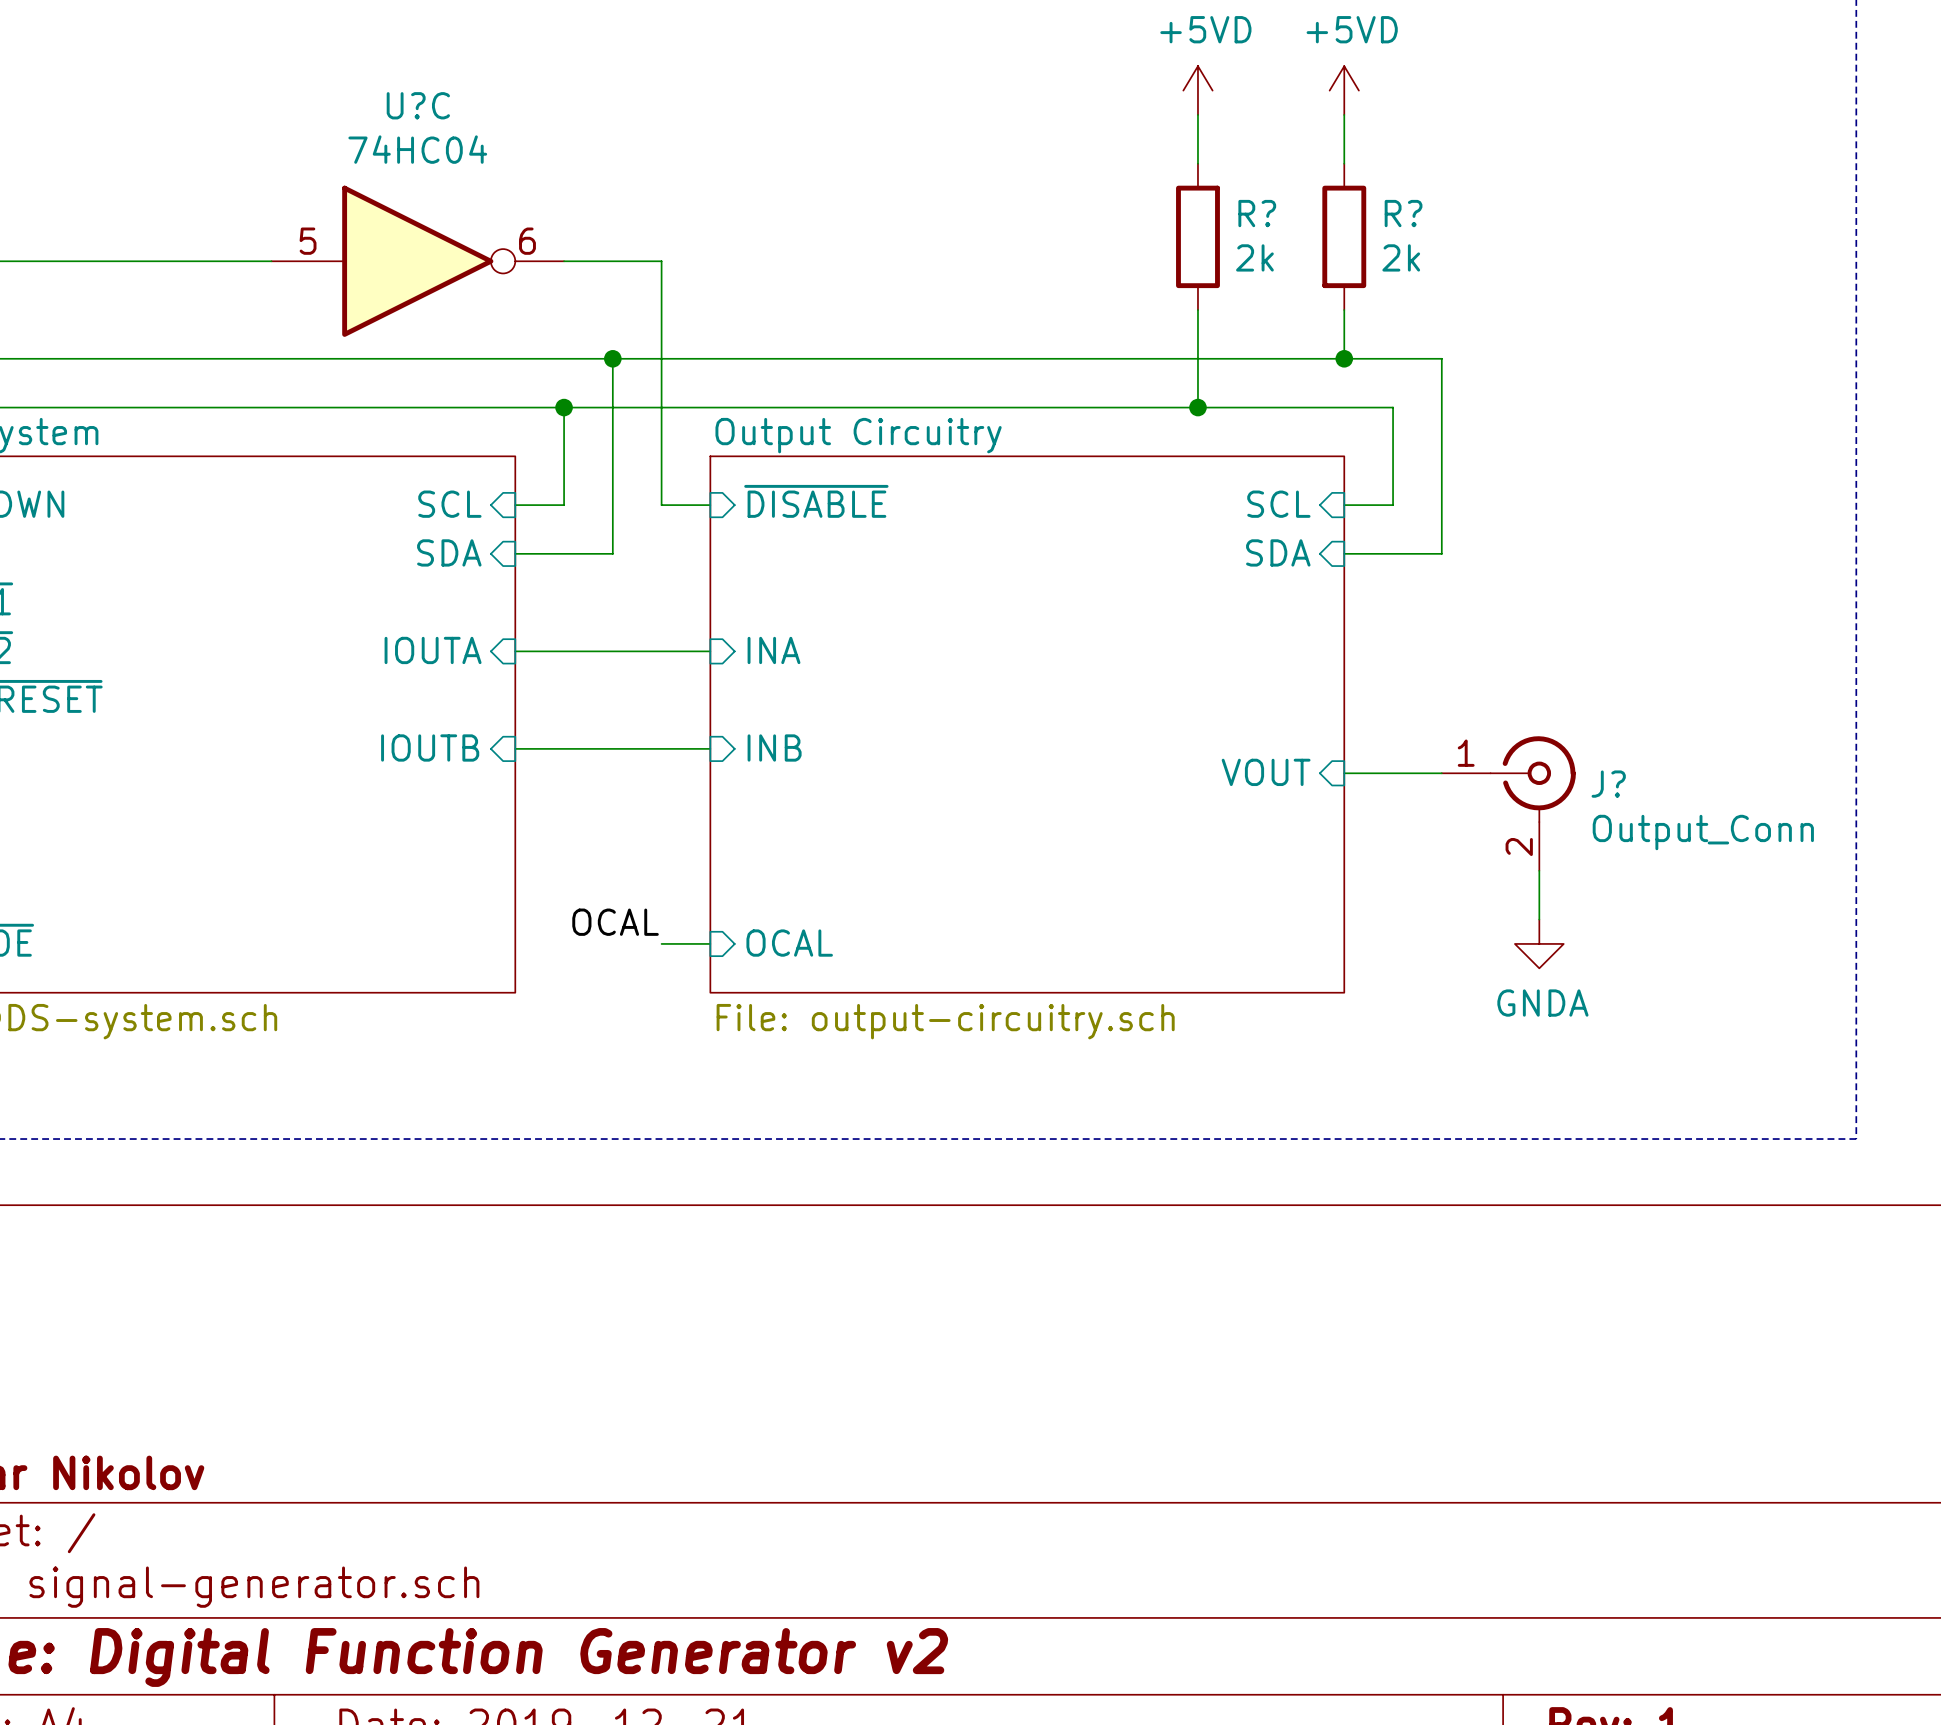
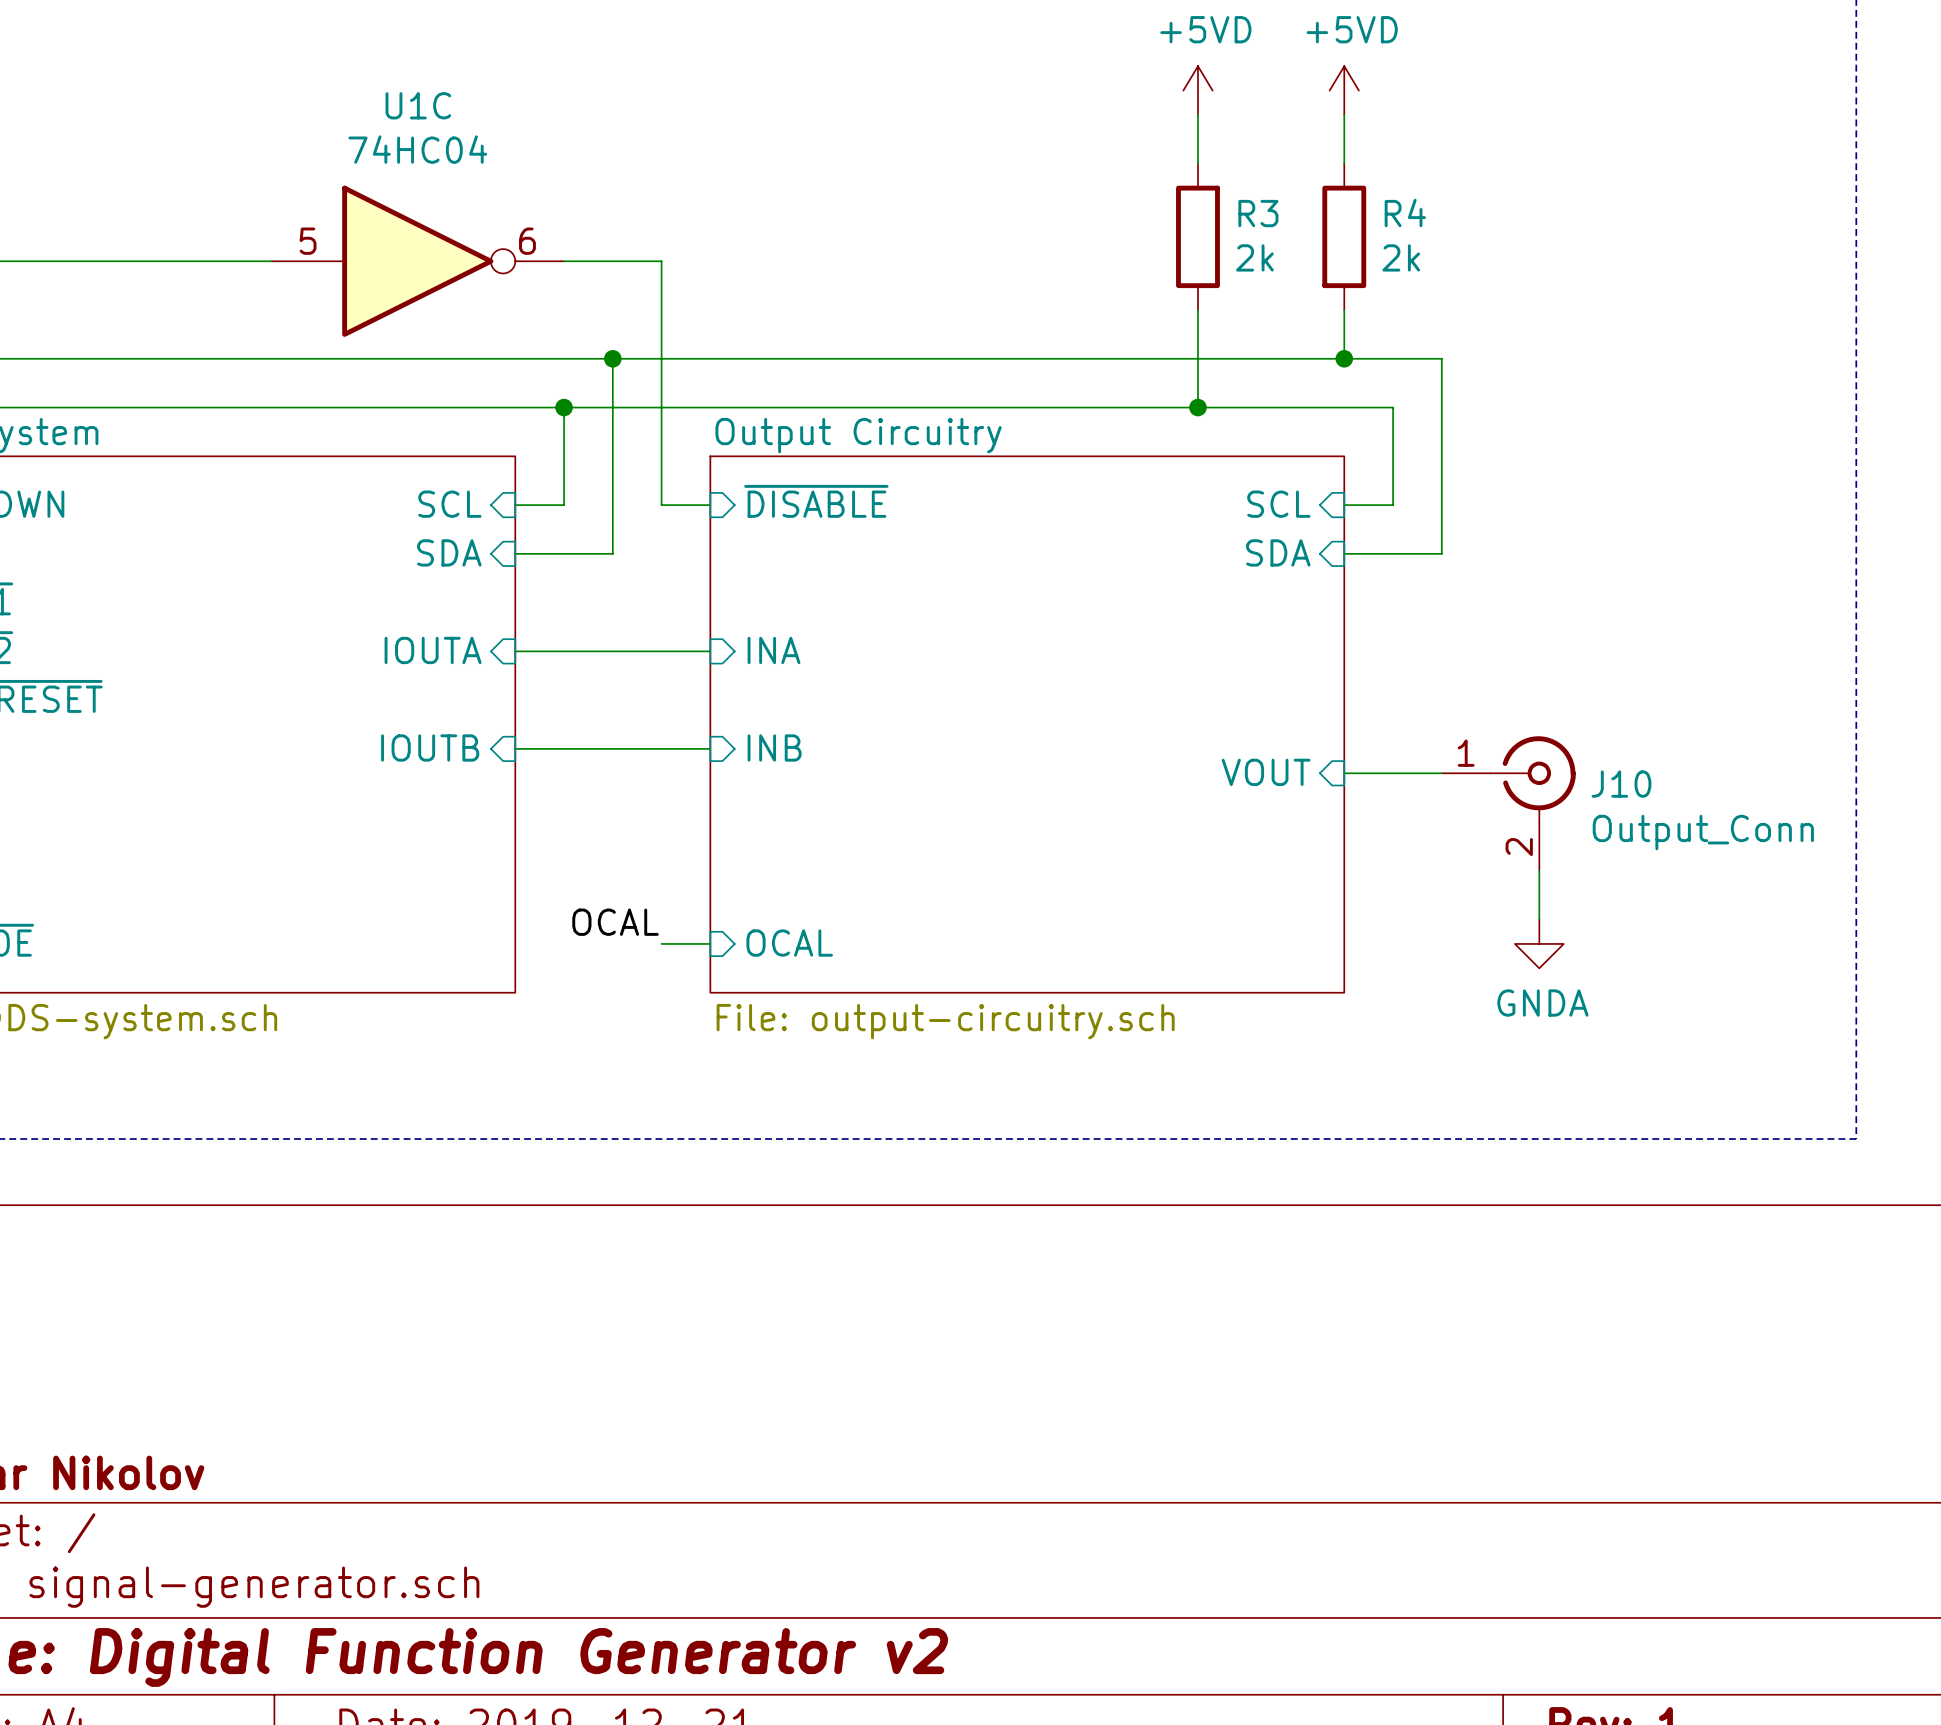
U?C name: U?C (418, 105) -> U1C (418, 105)
R? name: R? (1257, 213) -> R3 (1258, 213)
R? name: R? (1403, 213) -> R4 (1405, 212)
J? name: J? (1608, 784) -> J10 (1621, 784)

